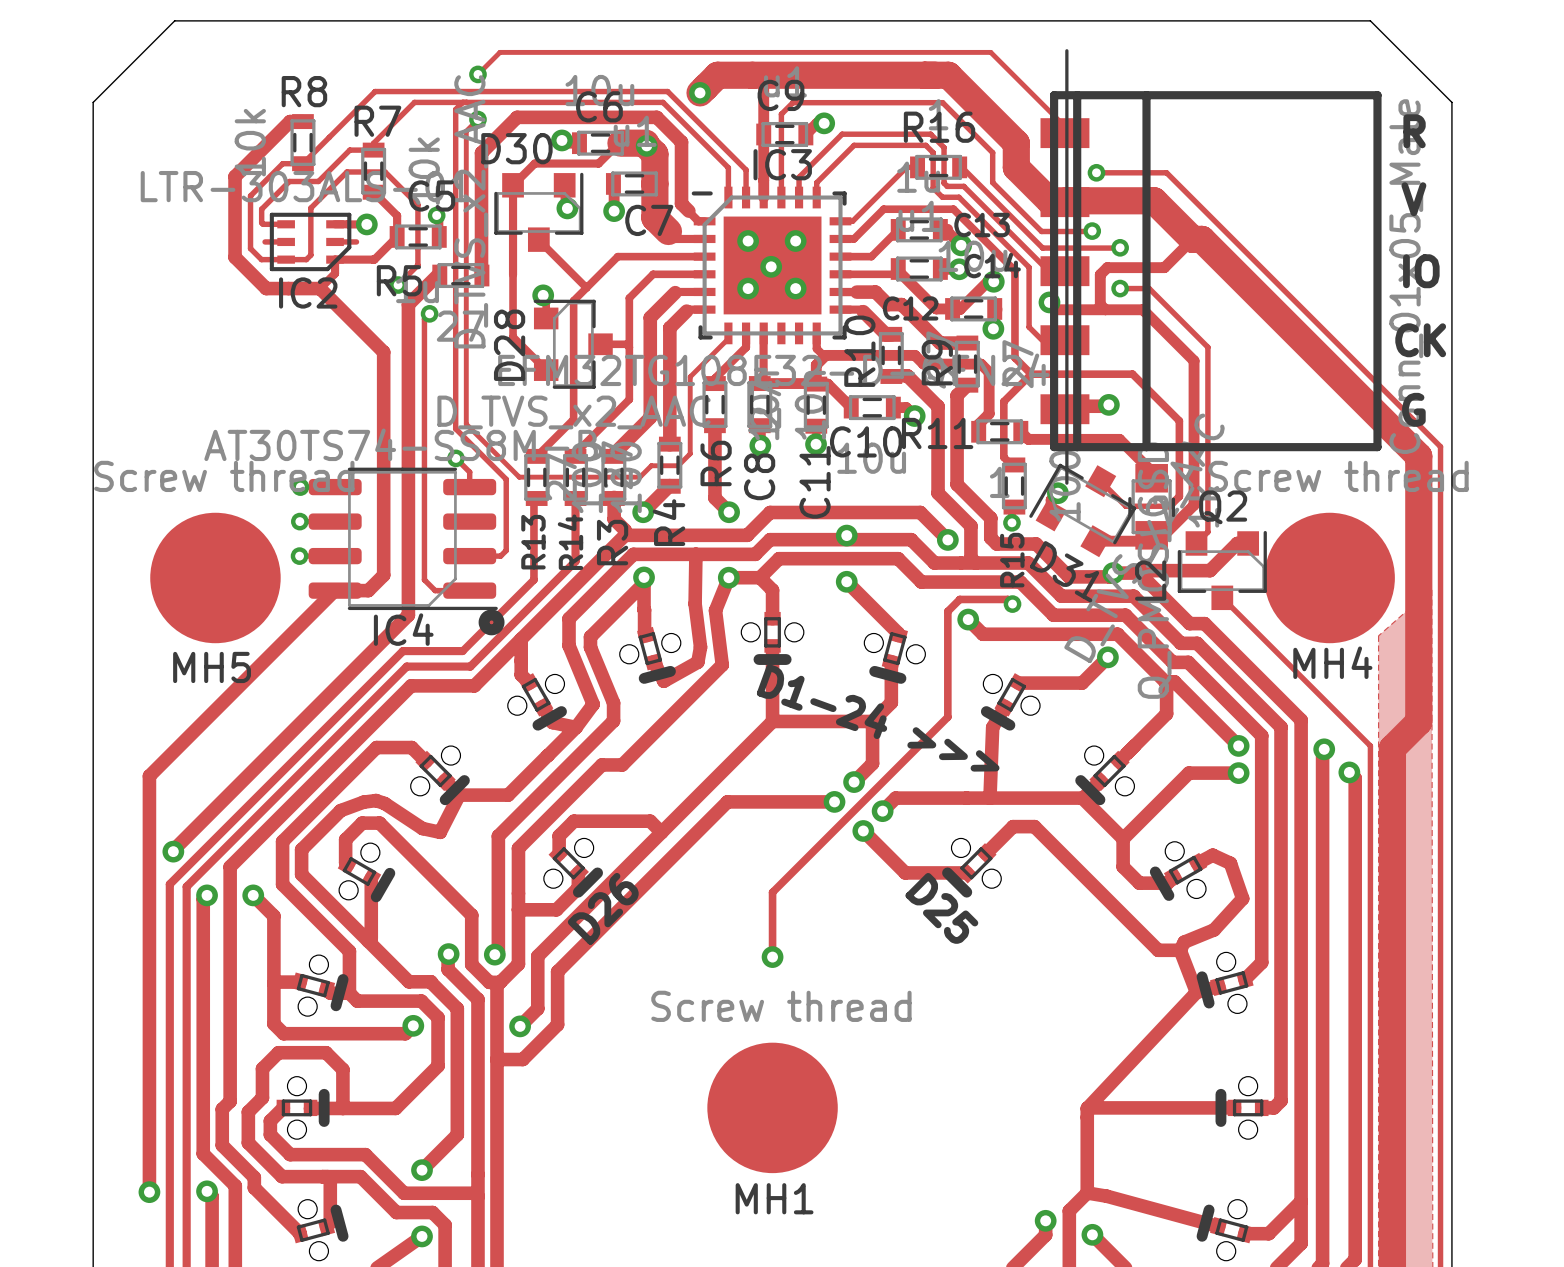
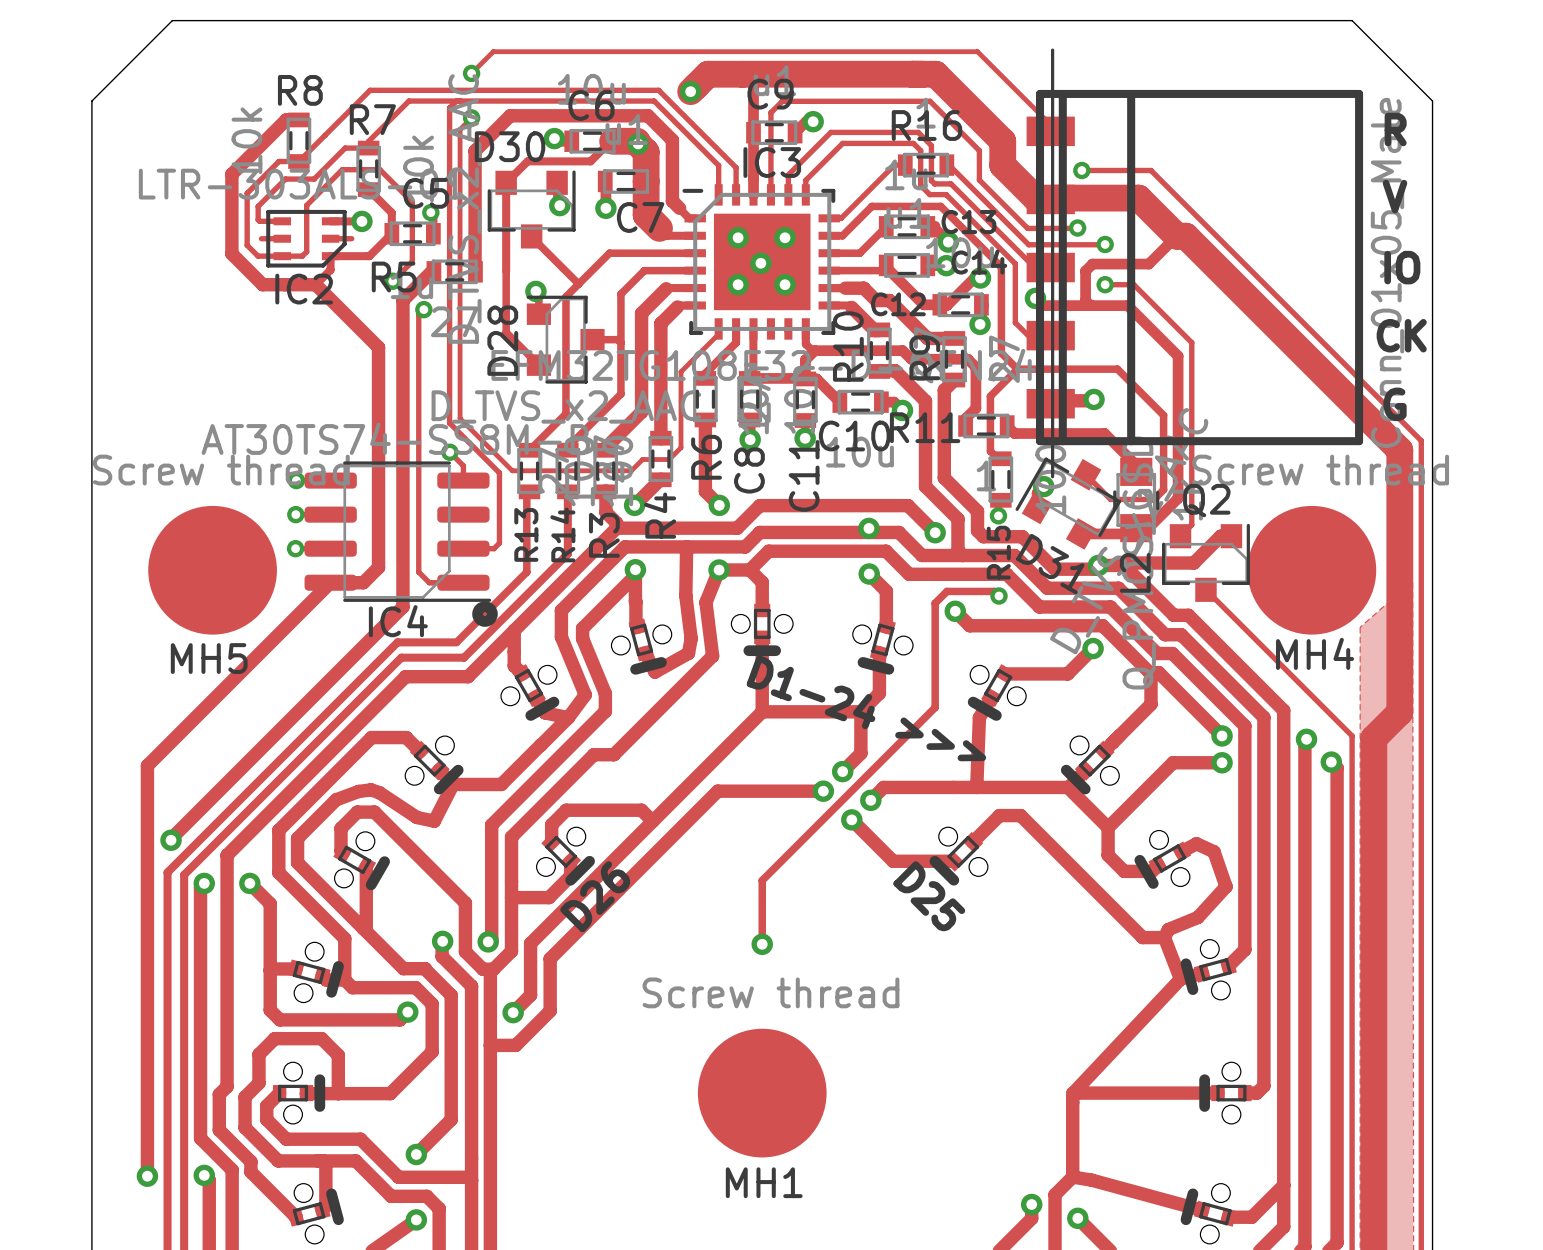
via: (846, 535) -> none
via: none -> (868, 528)
track: (846, 581) (898, 633) -> (869, 574) (886, 591) (886, 624)
via: (846, 581) -> none
via: none -> (869, 574)

